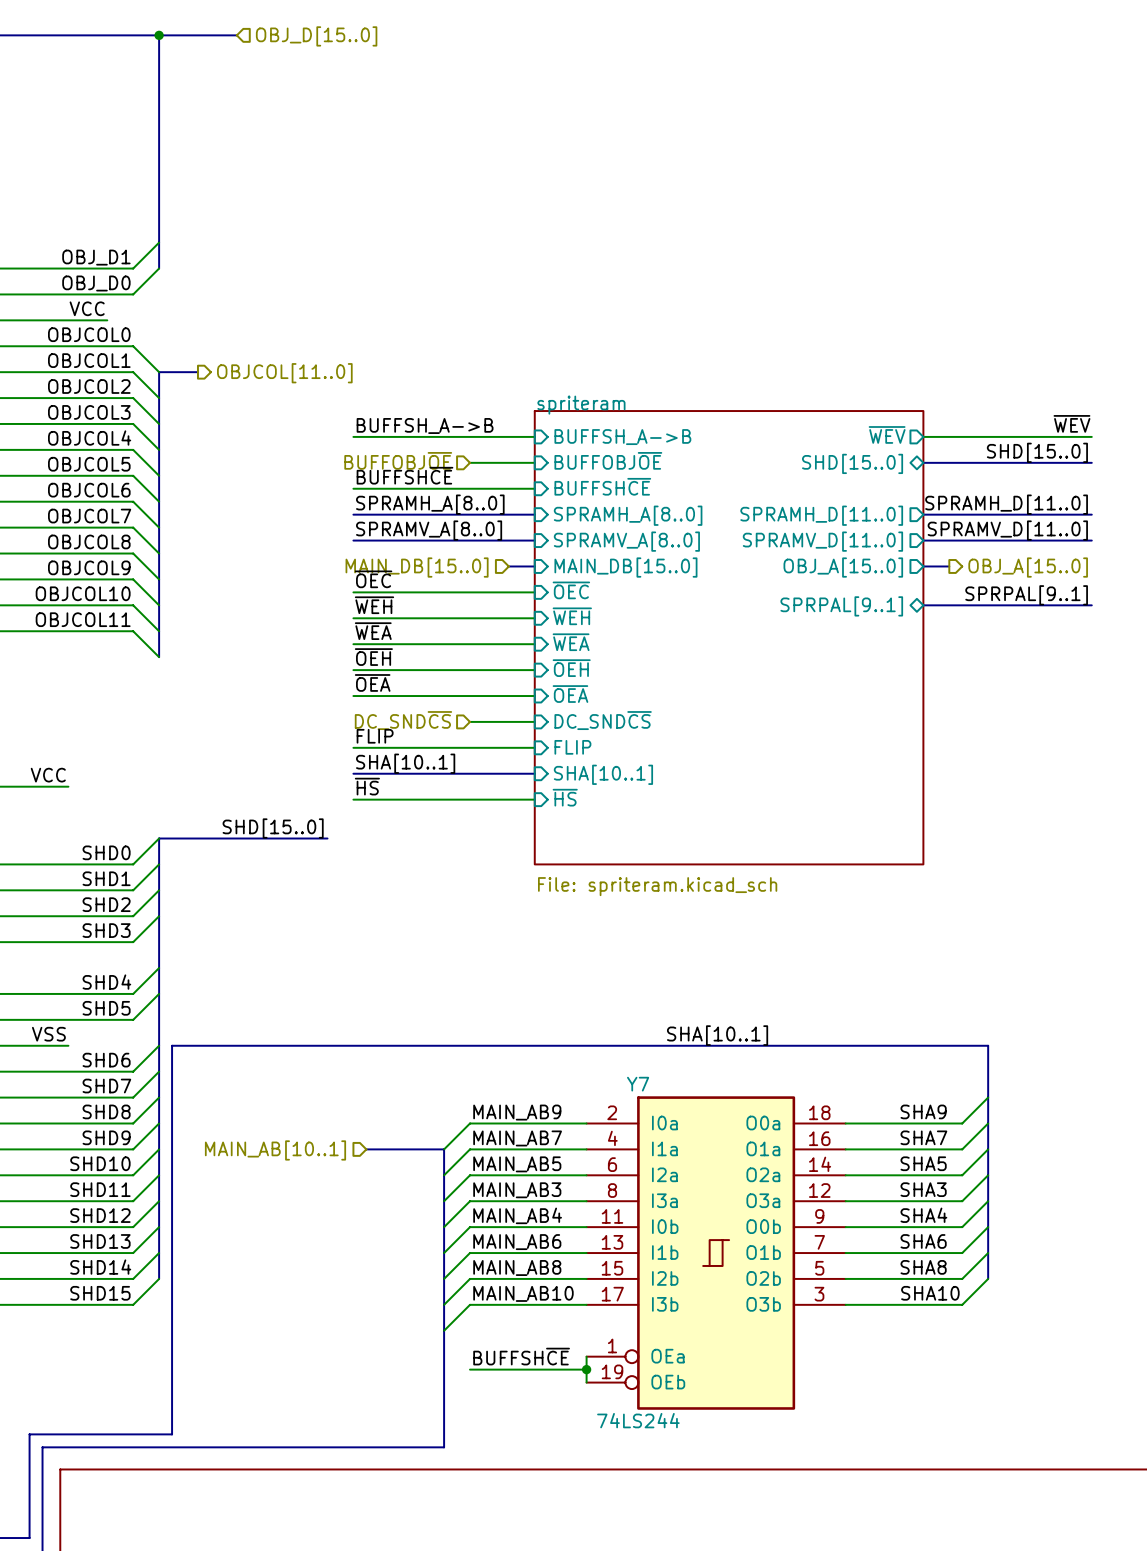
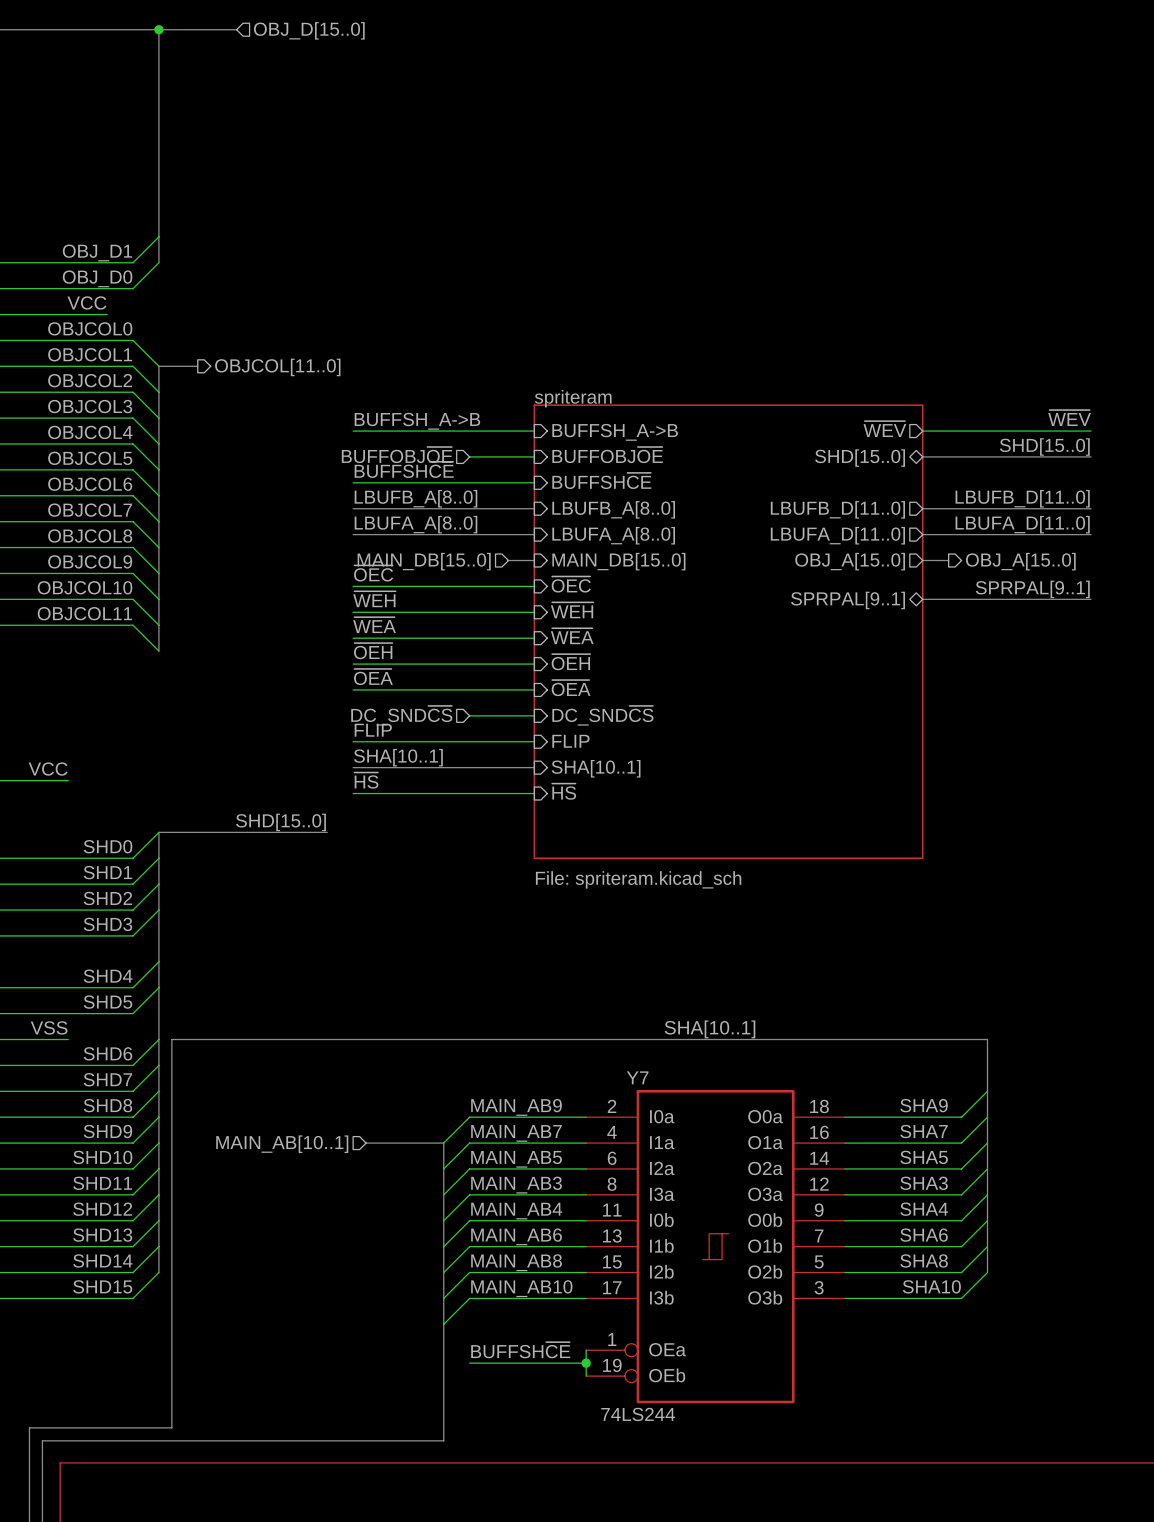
label: SPRAMH_A[8..0] (430, 504) -> LBUFB_A[8..0] (415, 498)
label: SPRAMH_D[11..0] (1006, 504) -> LBUFB_D[11..0] (1022, 498)
sheet pin: SPRAMH_A[8..0] (628, 515) -> LBUFB_A[8..0] (613, 509)
sheet pin: SPRAMH_D[11..0] (821, 515) -> LBUFB_D[11..0] (837, 509)
label: SPRAMV_A[8..0] (429, 530) -> LBUFA_A[8..0] (415, 524)
label: SPRAMV_D[11..0] (1007, 530) -> LBUFA_D[11..0] (1022, 524)
sheet pin: SPRAMV_A[8..0] (626, 541) -> LBUFA_A[8..0] (613, 535)
sheet pin: SPRAMV_D[11..0] (822, 541) -> LBUFA_D[11..0] (837, 535)

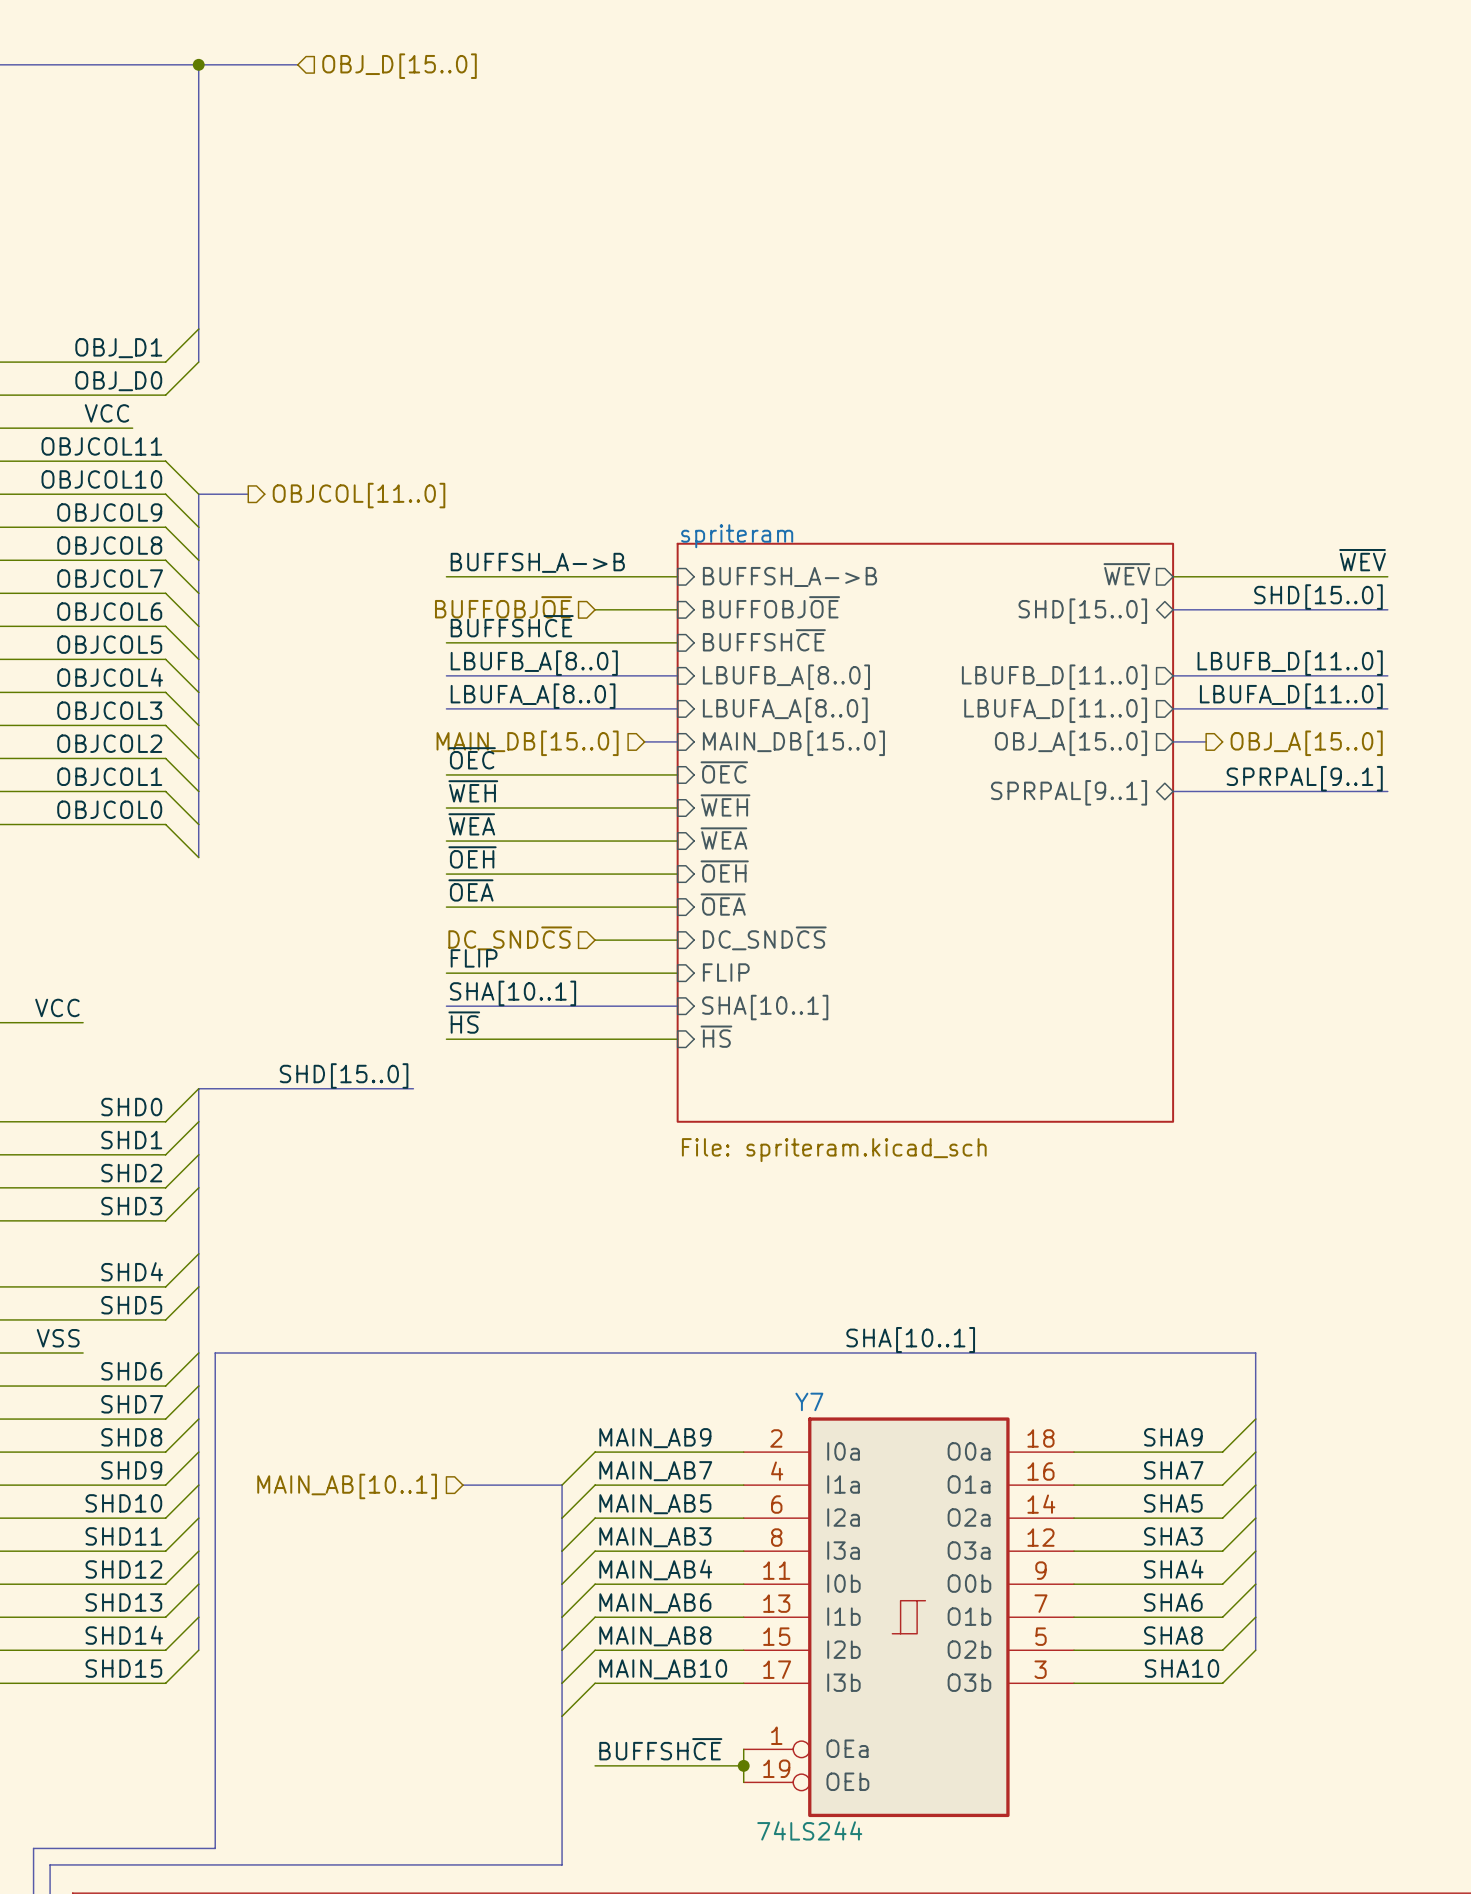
label: OBJCOL0 (90, 328) -> OBJCOL11 (101, 446)
label: OBJCOL1 (90, 354) -> OBJCOL10 (101, 479)
label: OBJCOL2 (90, 380) -> OBJCOL9 (109, 512)
label: OBJCOL3 (90, 406) -> OBJCOL8 (109, 545)
label: OBJCOL4 (90, 432) -> OBJCOL7 (110, 578)
label: OBJCOL5 (90, 458) -> OBJCOL6 (109, 611)
label: OBJCOL6 (90, 484) -> OBJCOL5 (109, 644)
label: OBJCOL7 (90, 510) -> OBJCOL4 (110, 677)
label: OBJCOL8 (90, 536) -> OBJCOL3 (109, 710)
label: OBJCOL9 (90, 561) -> OBJCOL2 (109, 743)
label: OBJCOL10 (85, 587) -> OBJCOL1 (109, 776)
label: OBJCOL11 (84, 613) -> OBJCOL0 (109, 809)

